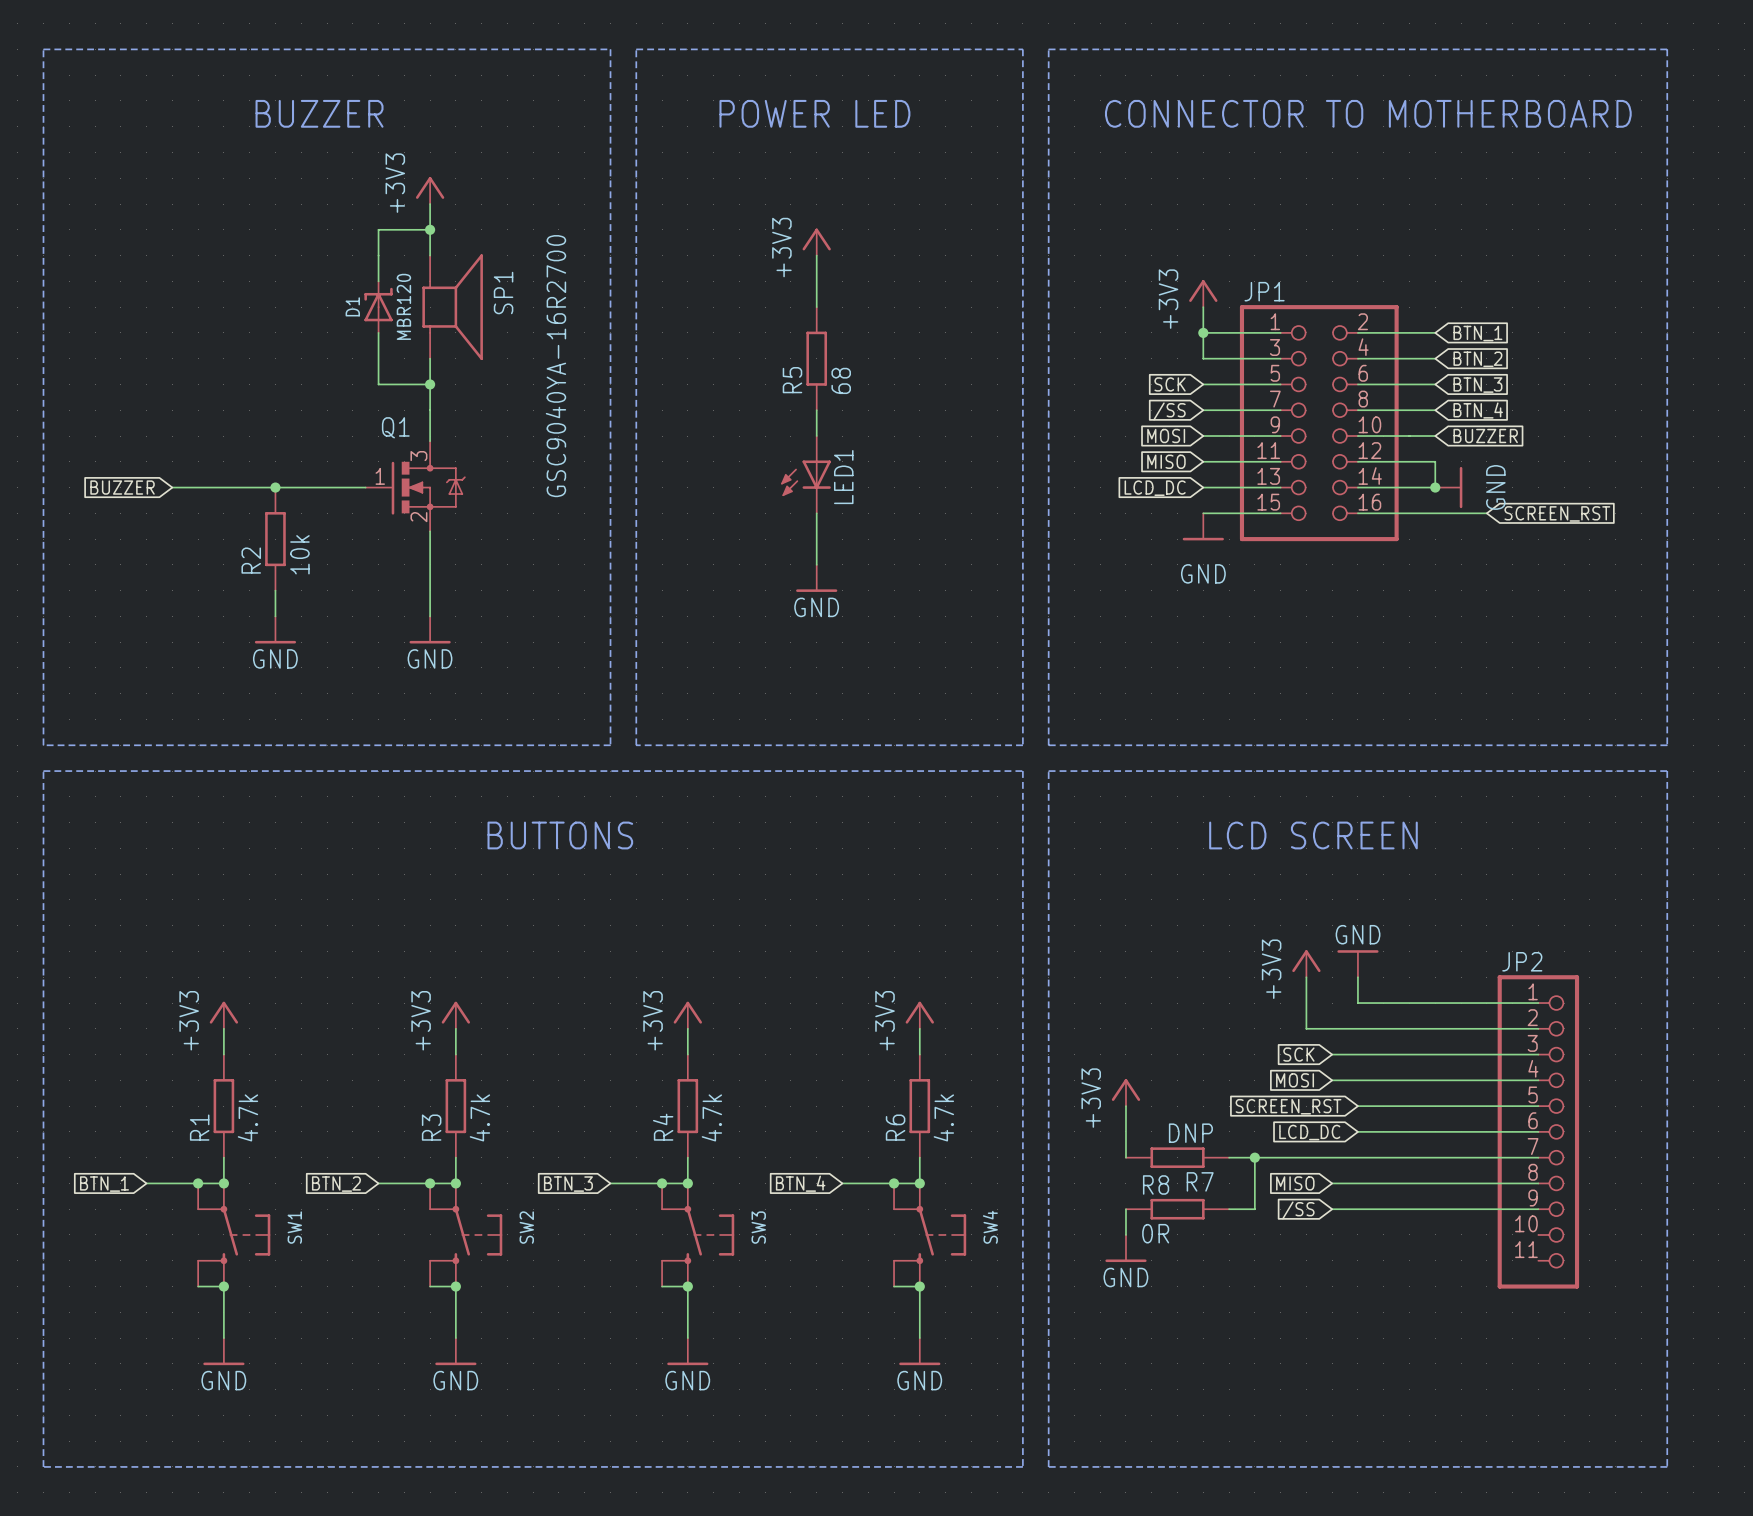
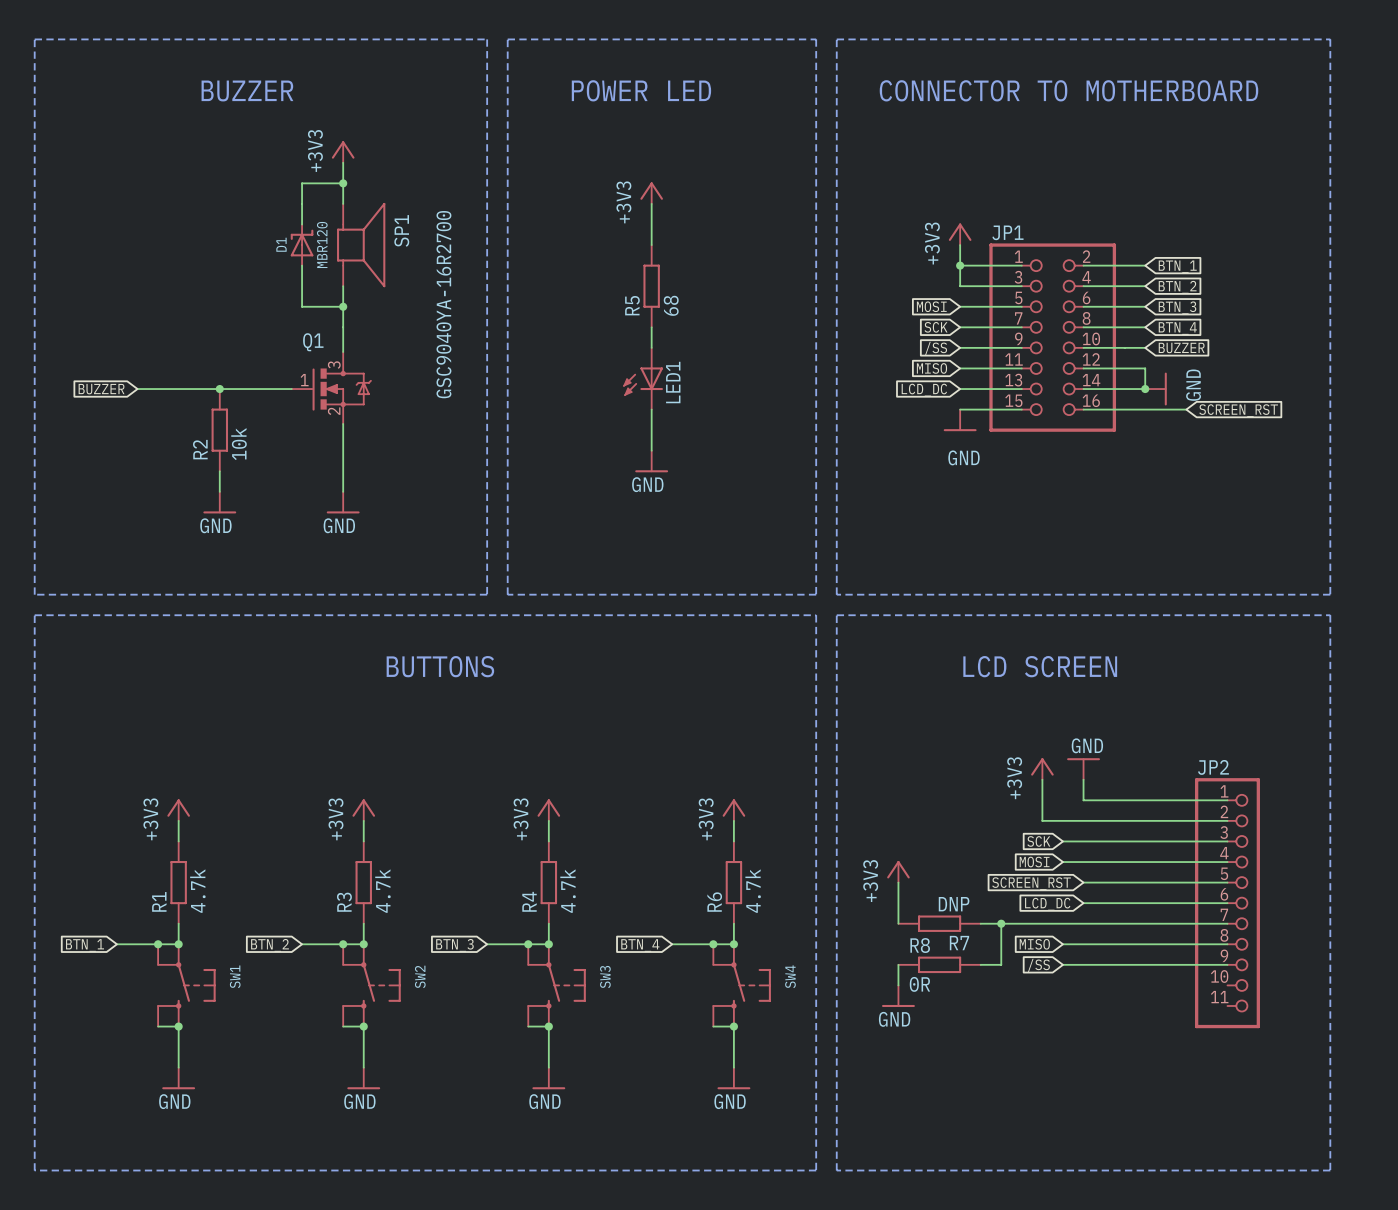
global label: SCK (1170, 384) -> MOSI (931, 306)
global label: /SS (1169, 411) -> SCK (936, 327)
global label: MOSI (1166, 436) -> /SS (936, 348)

